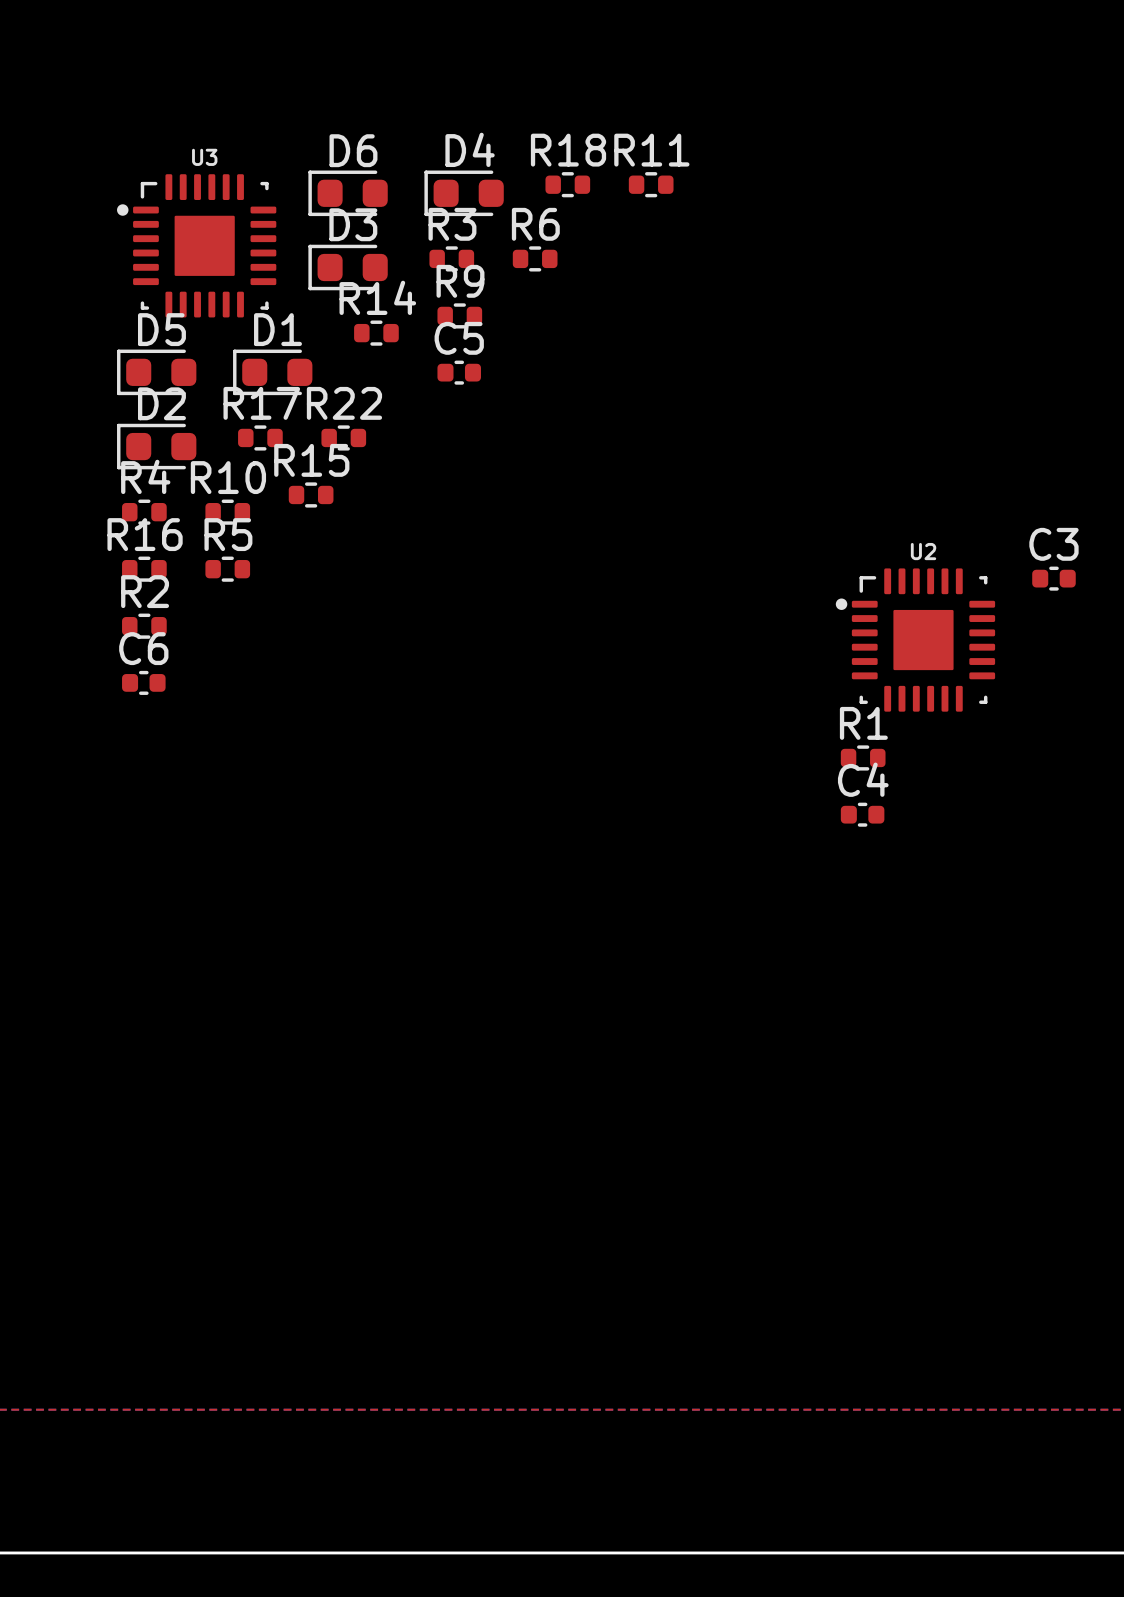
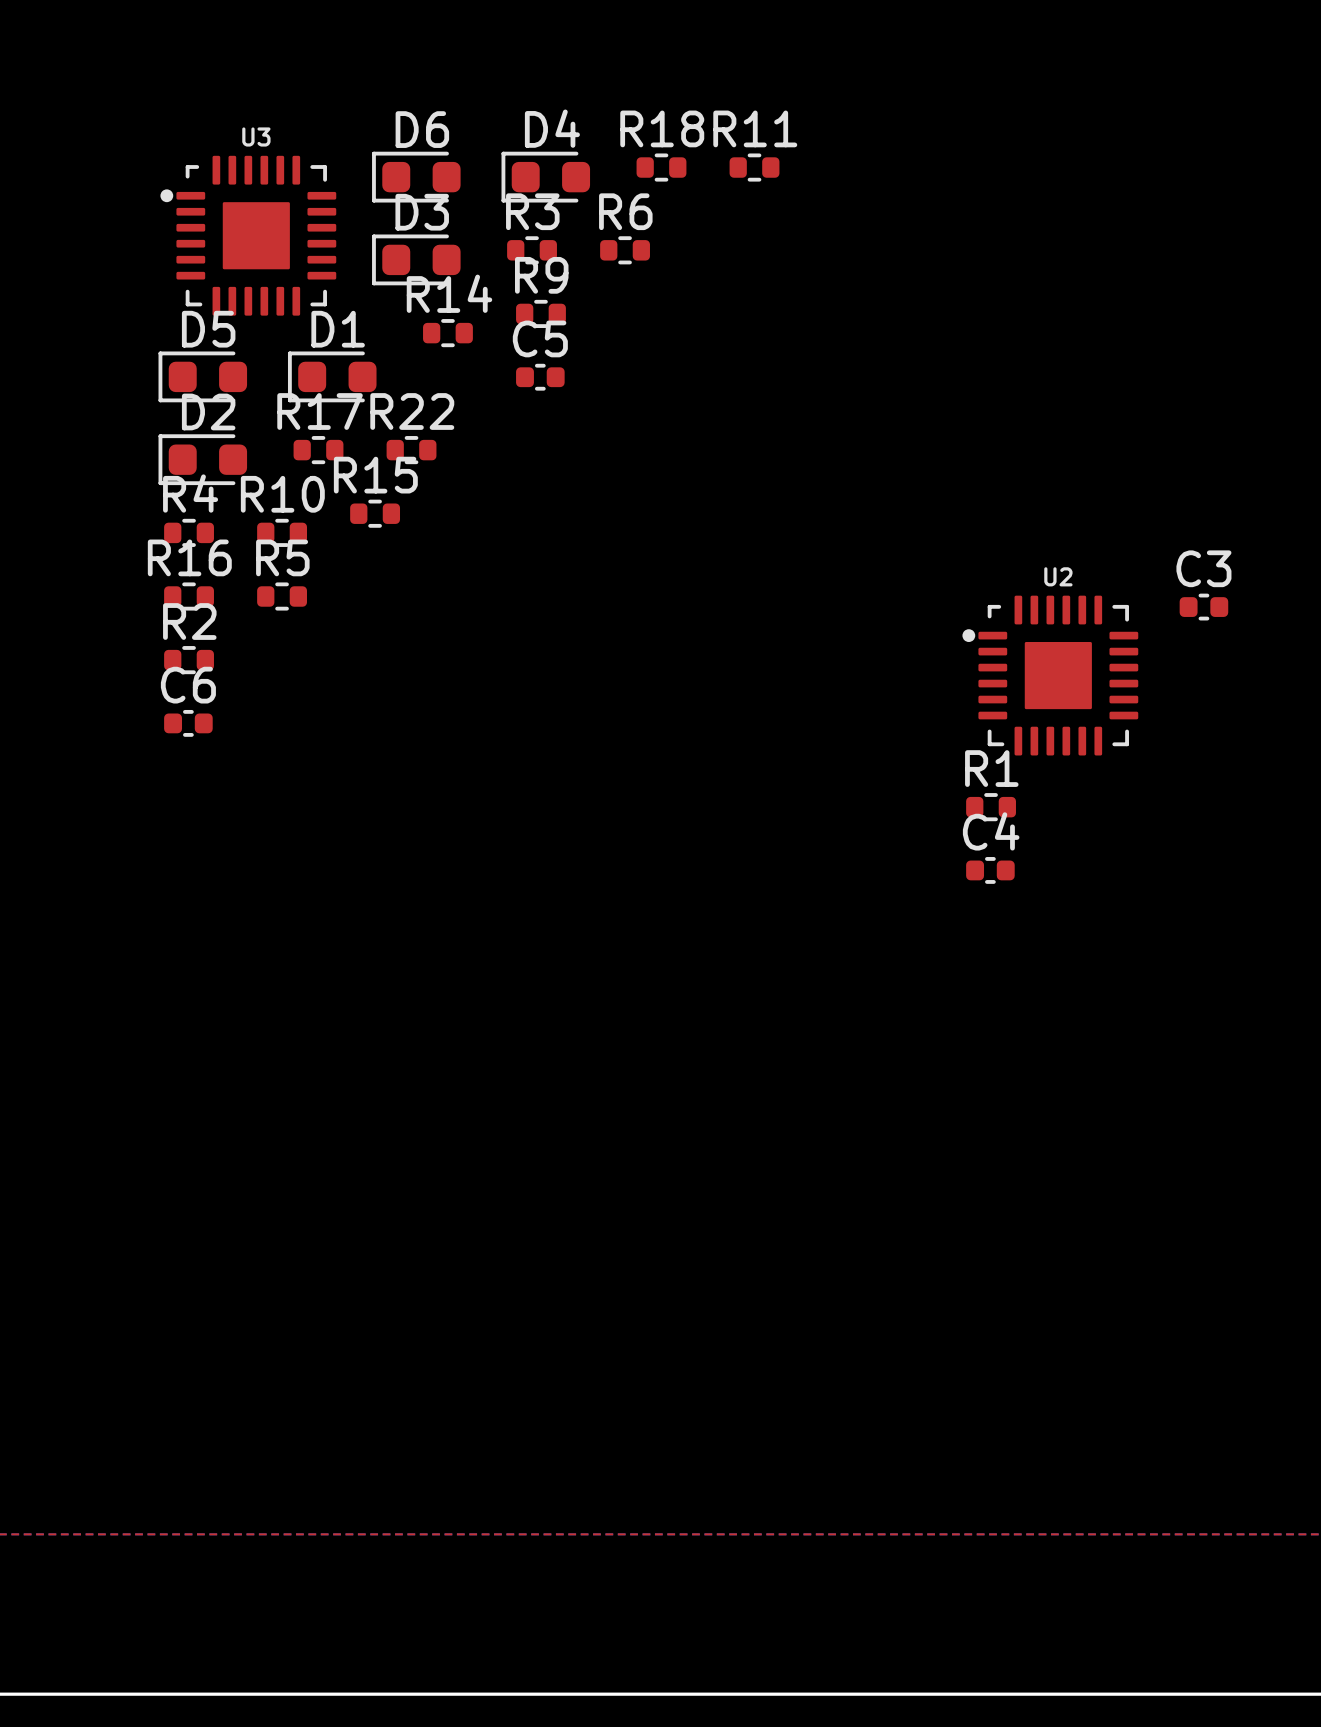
U3 footprint: [117, 174, 277, 318] -> [160, 155, 337, 316]
U2 footprint: [835, 568, 996, 712] -> [962, 595, 1139, 756]

